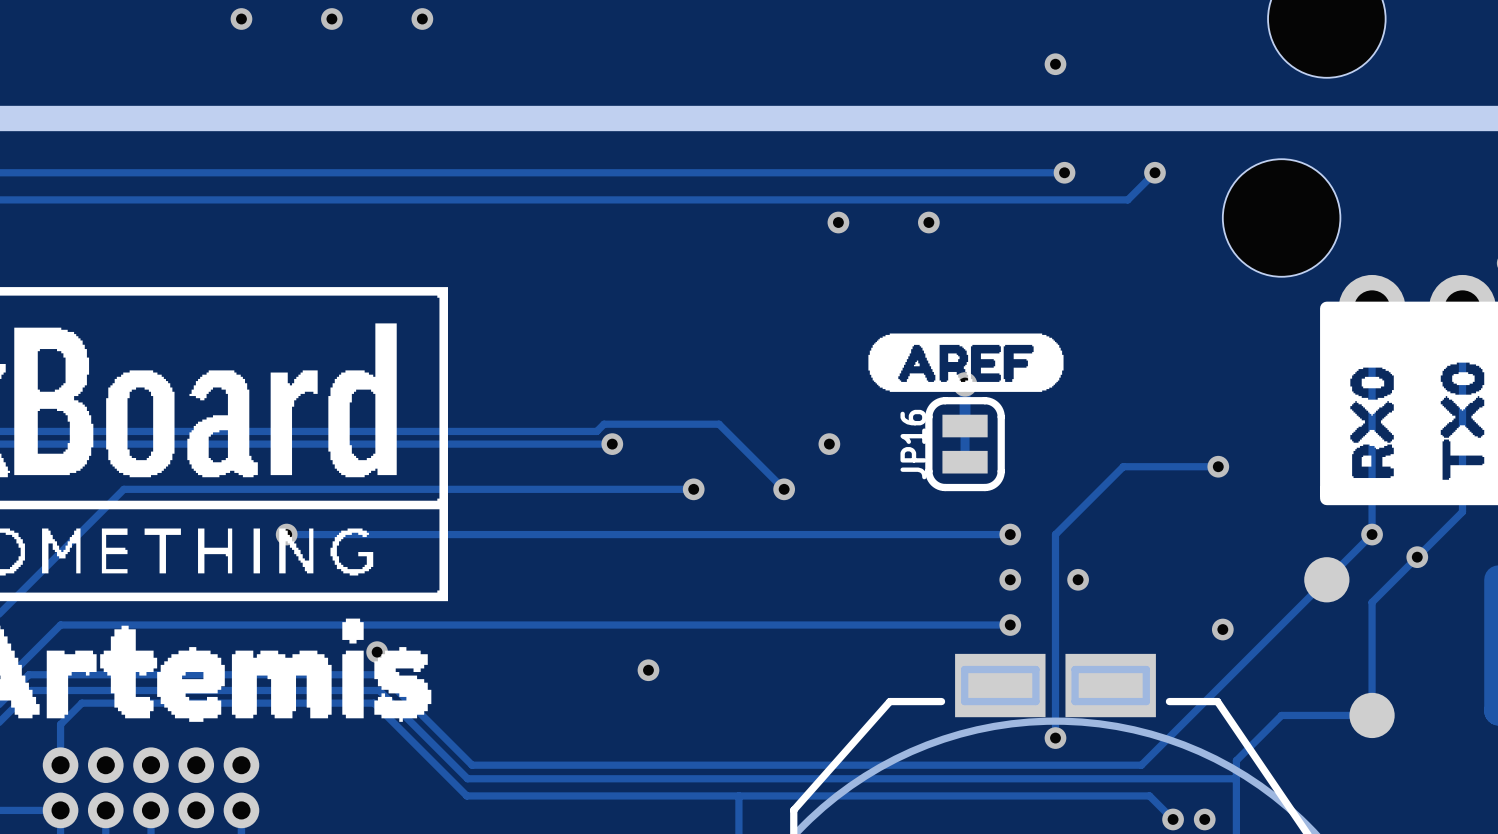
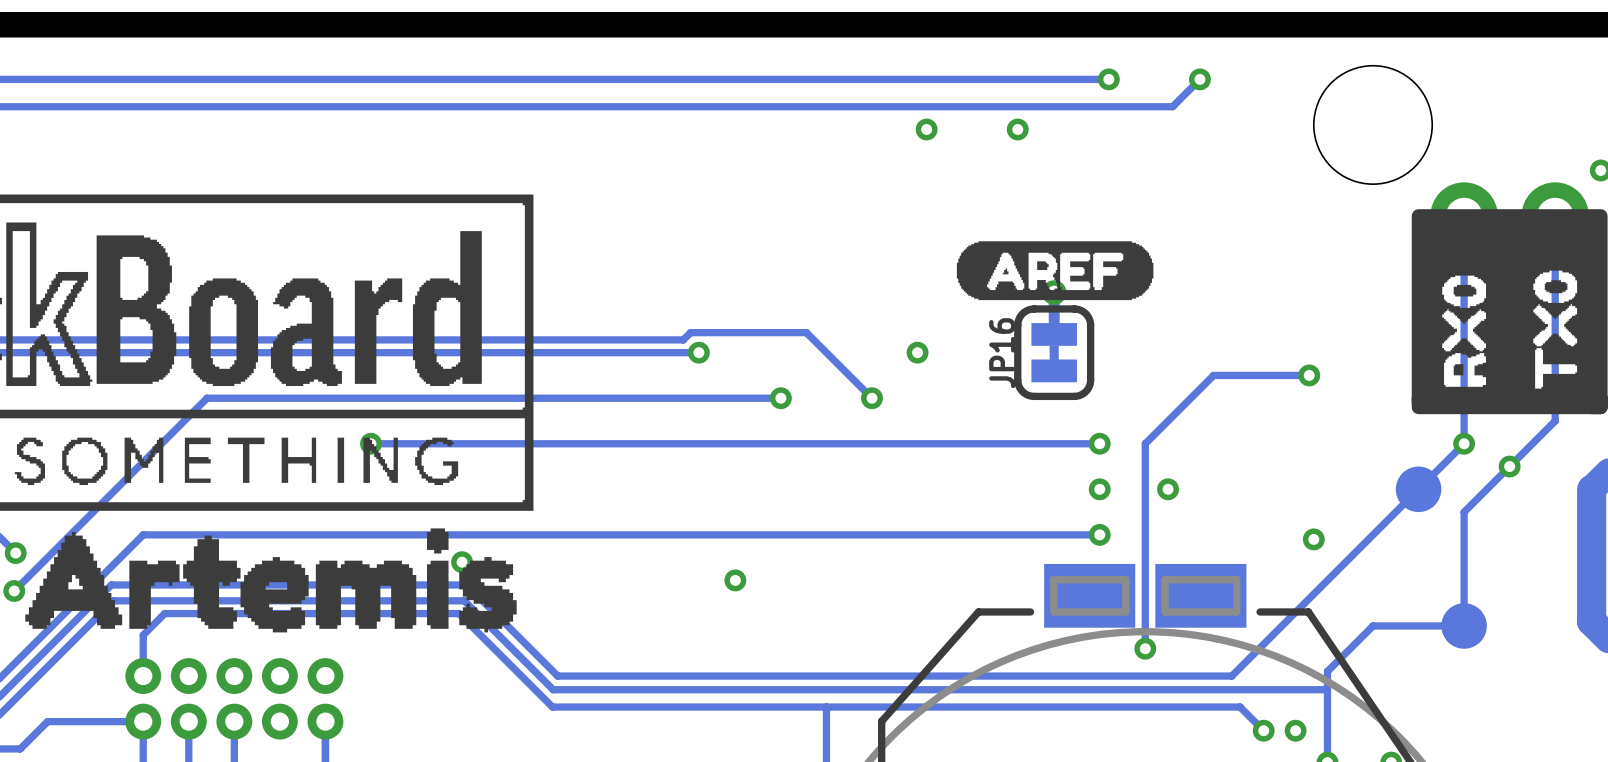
via: none -> (1108, 79)
track: (1064, 172) (1019, 172) -> none
via: (1064, 172) -> none
via: none -> (1199, 79)
track: (1154, 172) (1127, 199) (1082, 199) -> (1199, 79) (1172, 106)
via: (1154, 172) -> none

